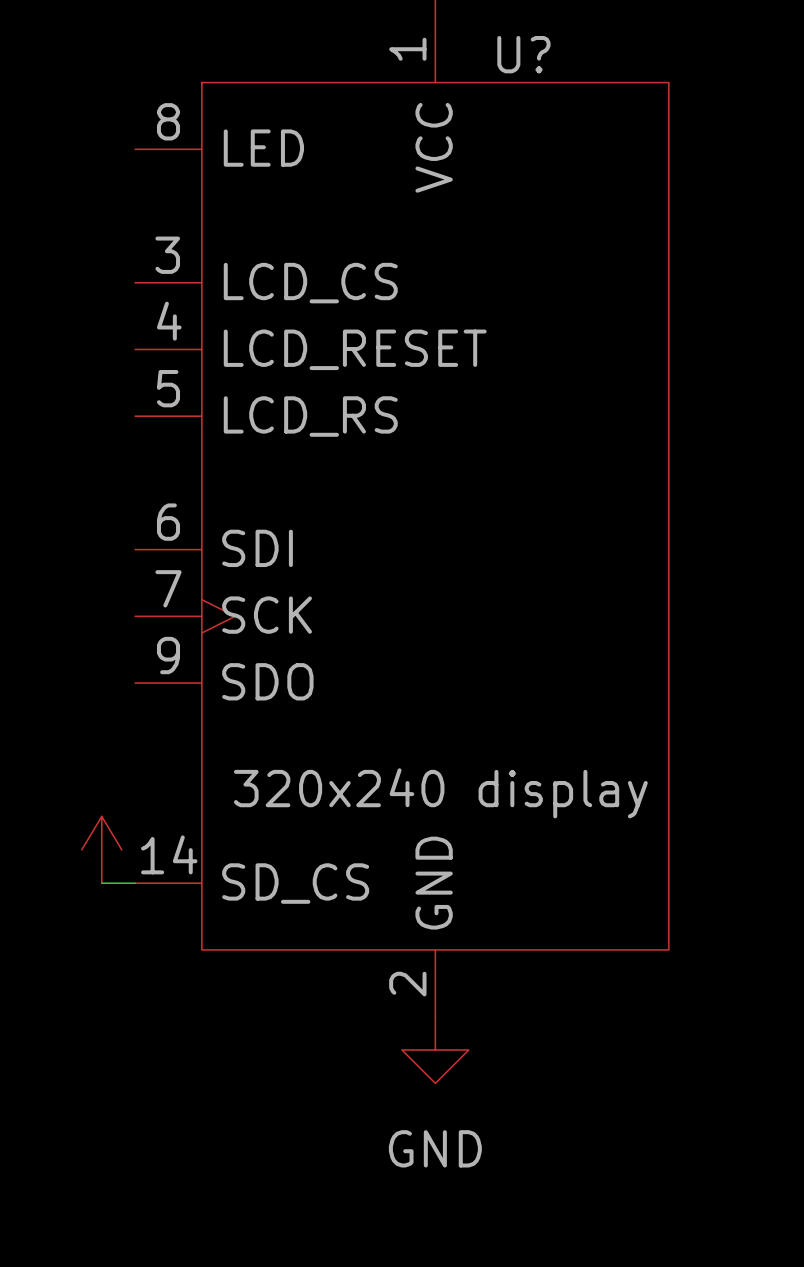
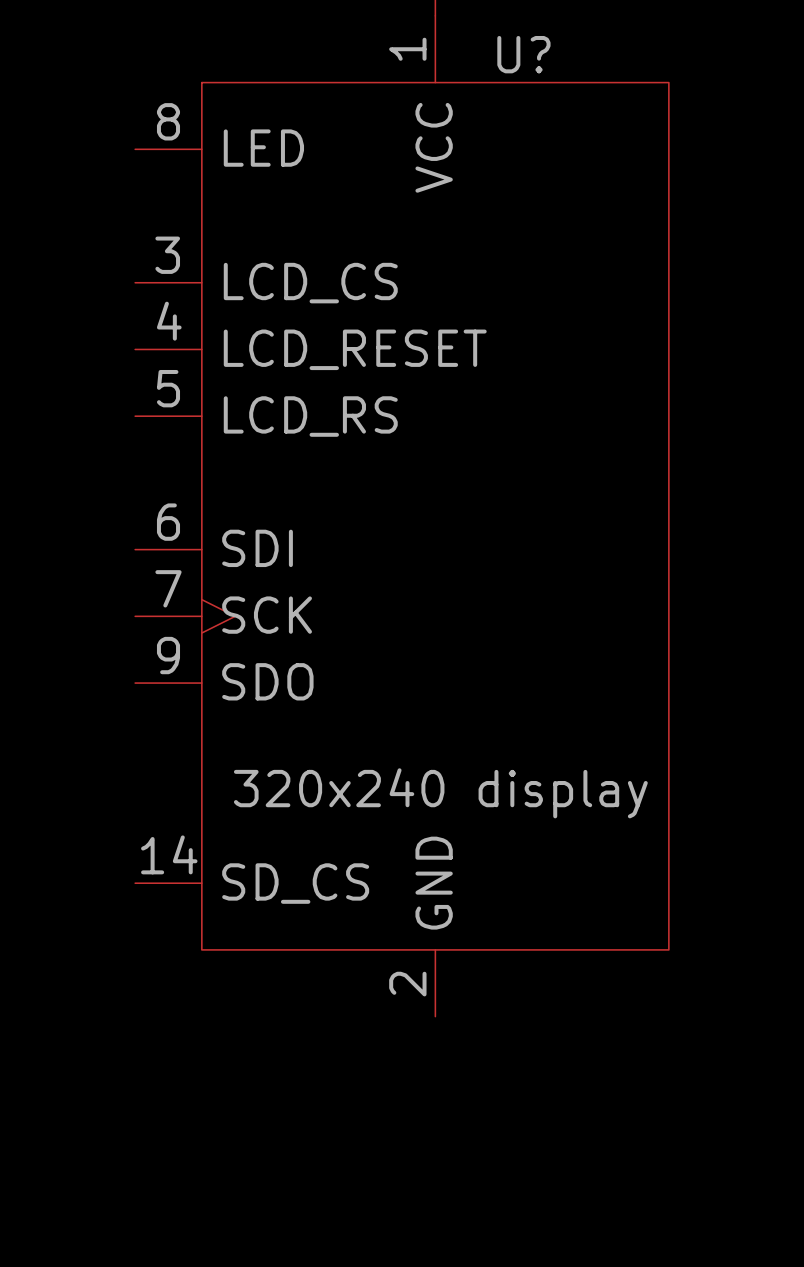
power symbol: (101, 849) -> none
wire: (101, 883) (135, 883) -> none
power symbol: GND (435, 1050) -> none

